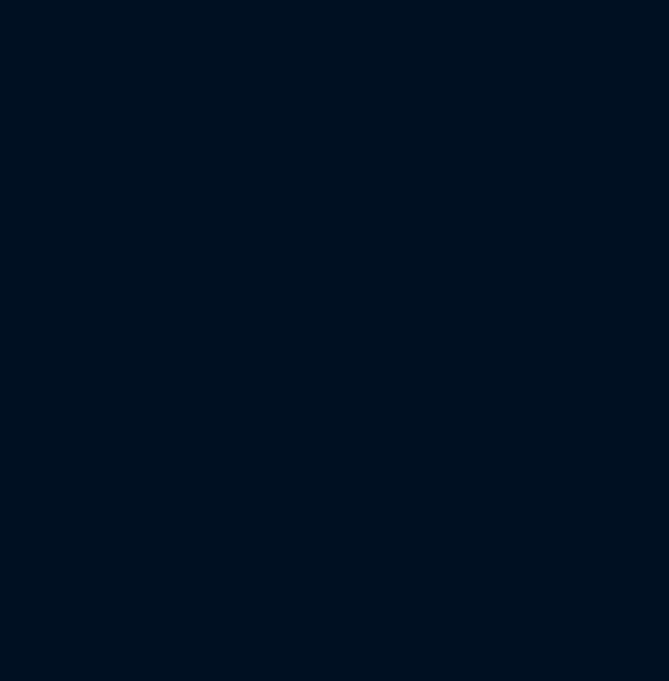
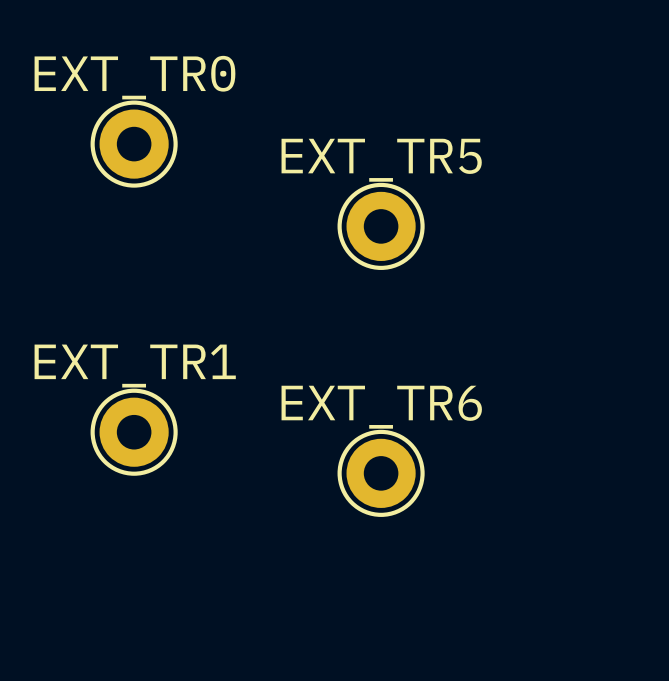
EXT_TR0: none -> (134, 144)
EXT_TR5: none -> (381, 226)
EXT_TR1: none -> (134, 432)
EXT_TR6: none -> (381, 473)

